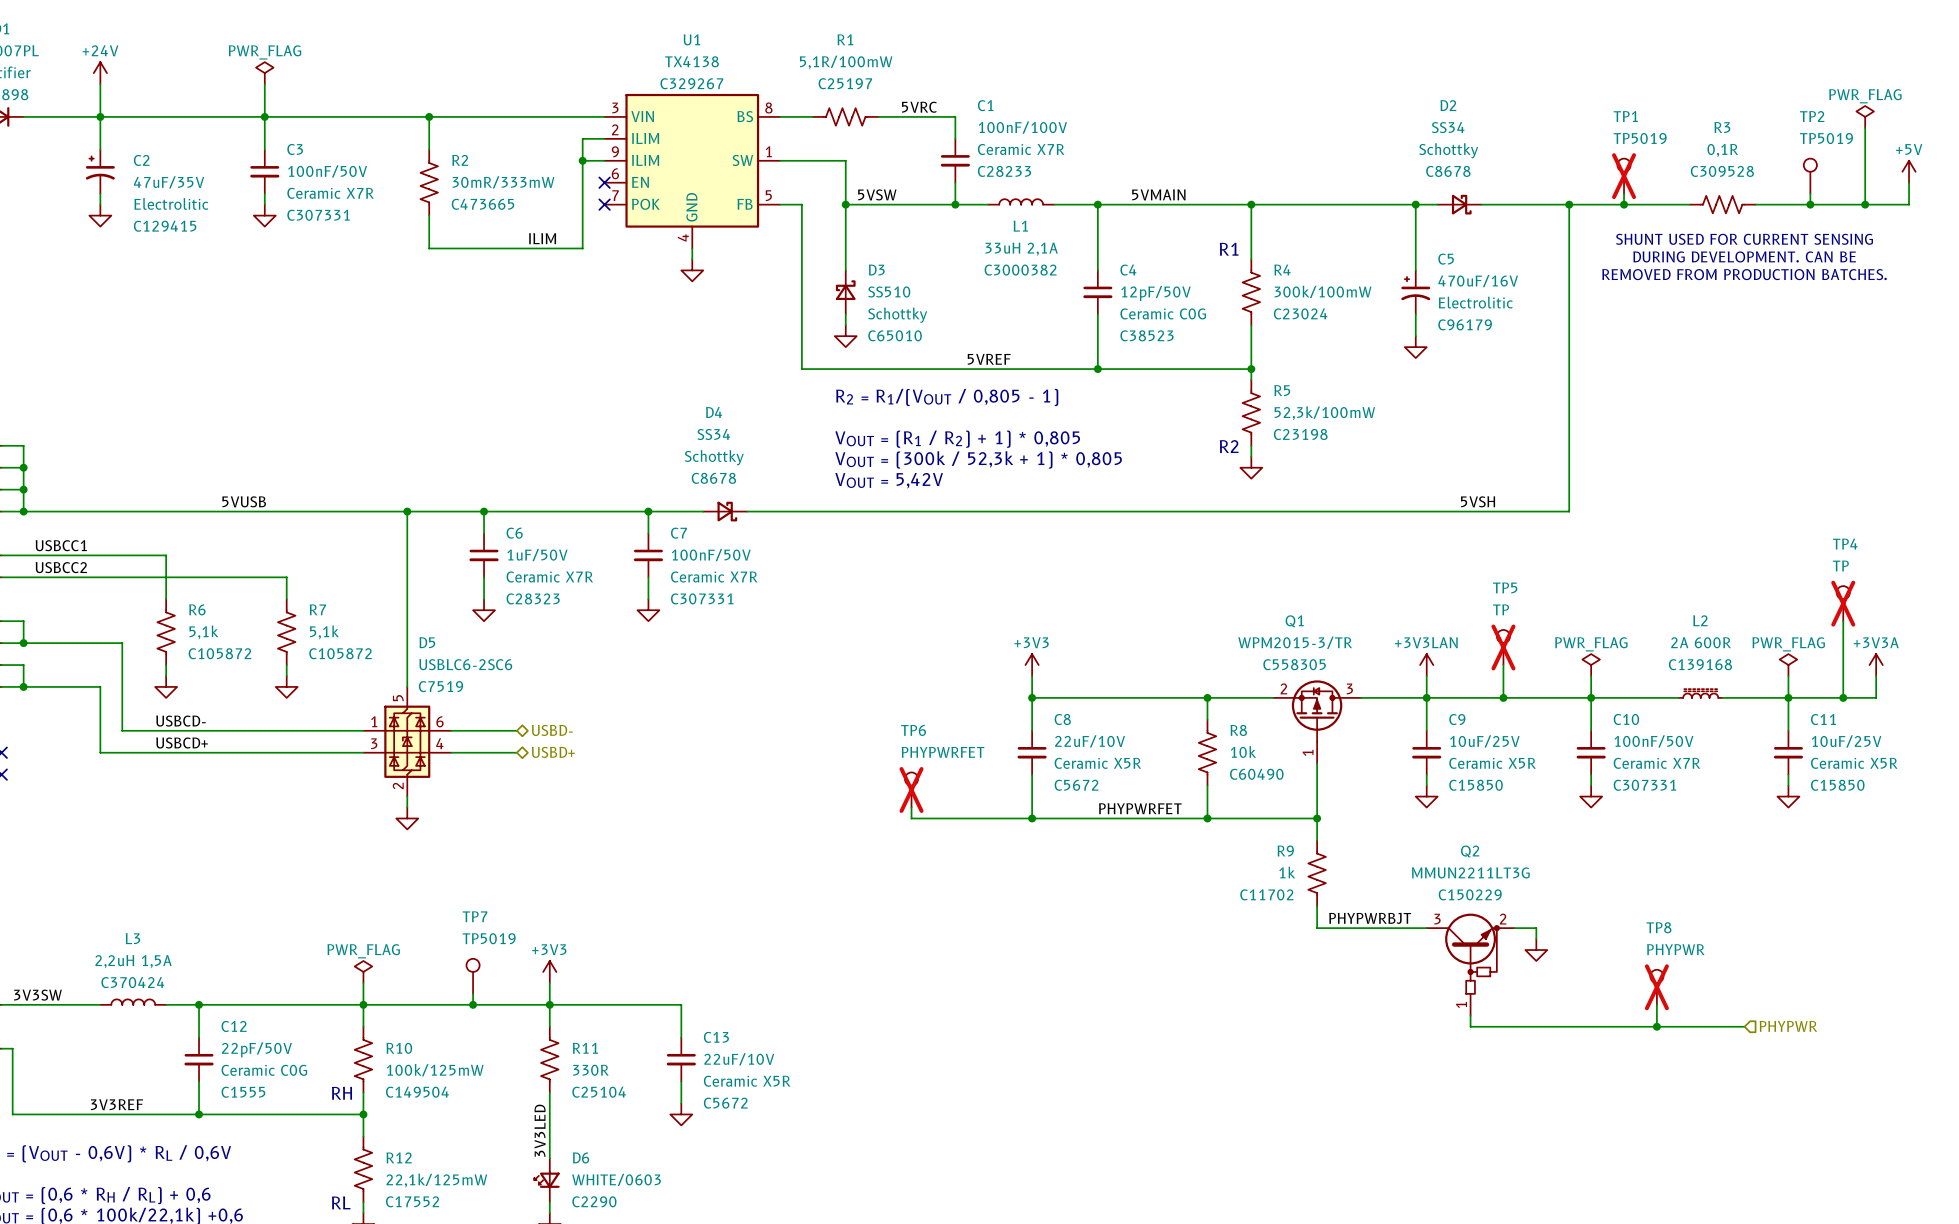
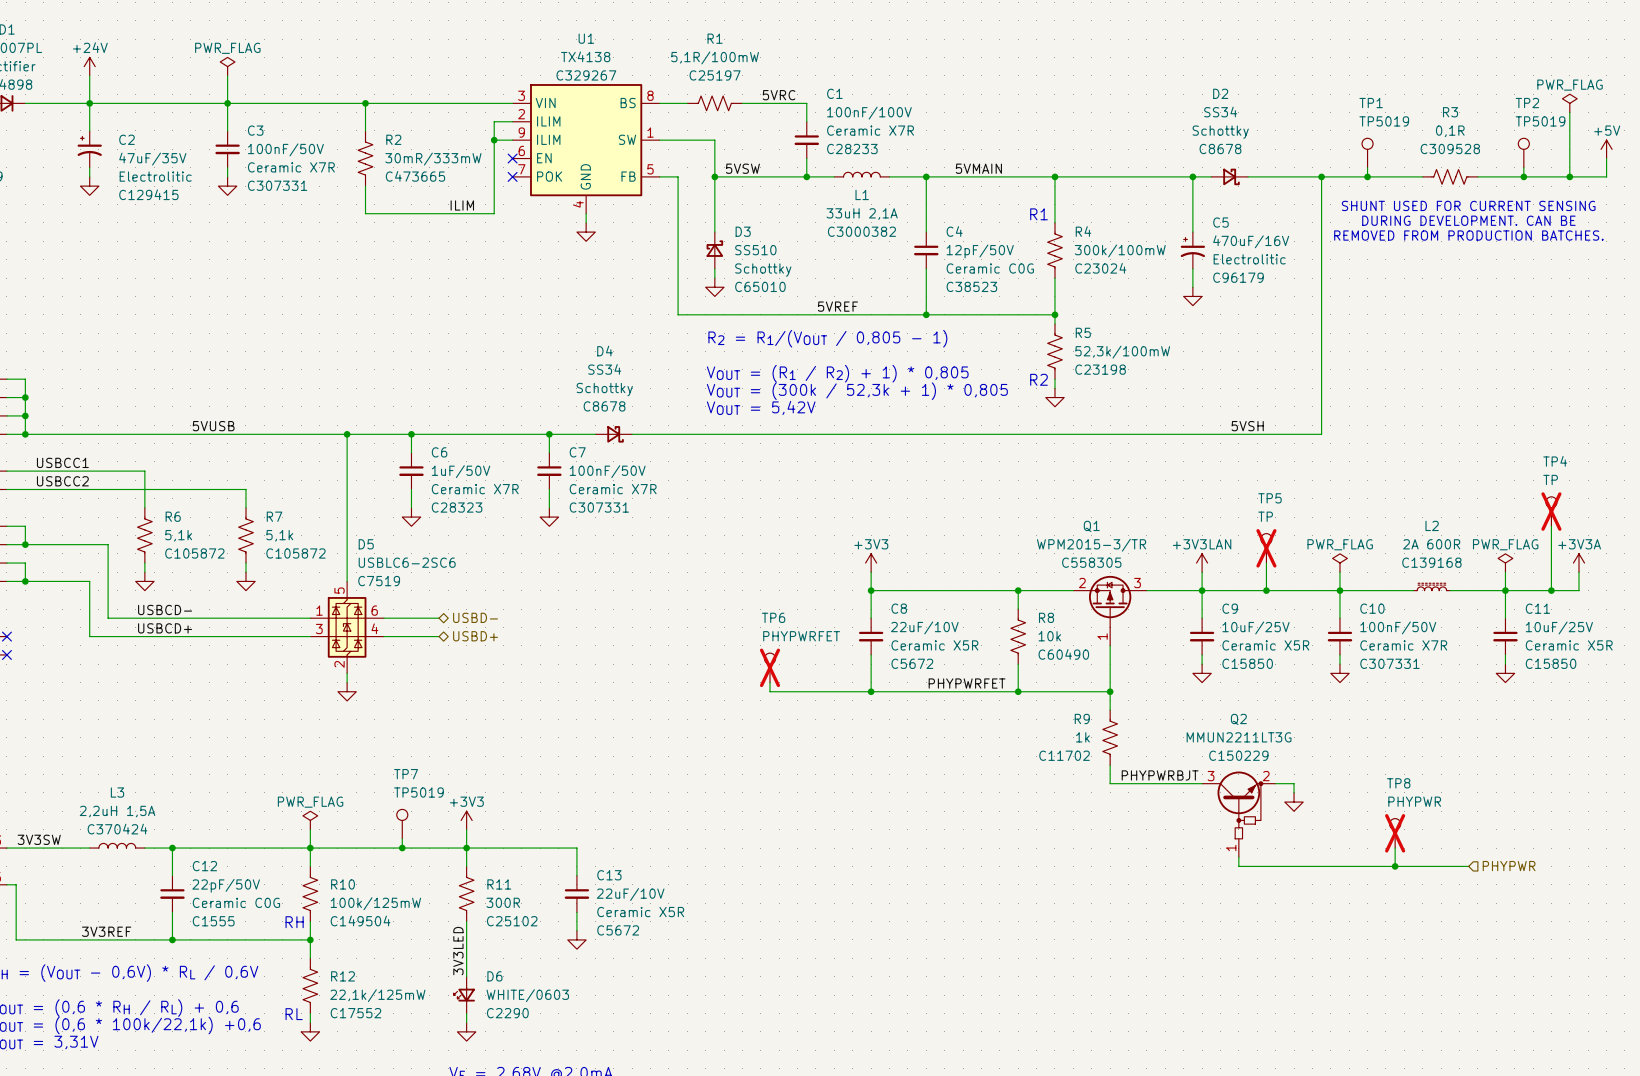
TP1 do-not-place cross: (1624, 176) -> none
R11 value: 330R (590, 1070) -> 300R (503, 902)
R11 text: C25104 (599, 1092) -> C25102 (512, 921)

